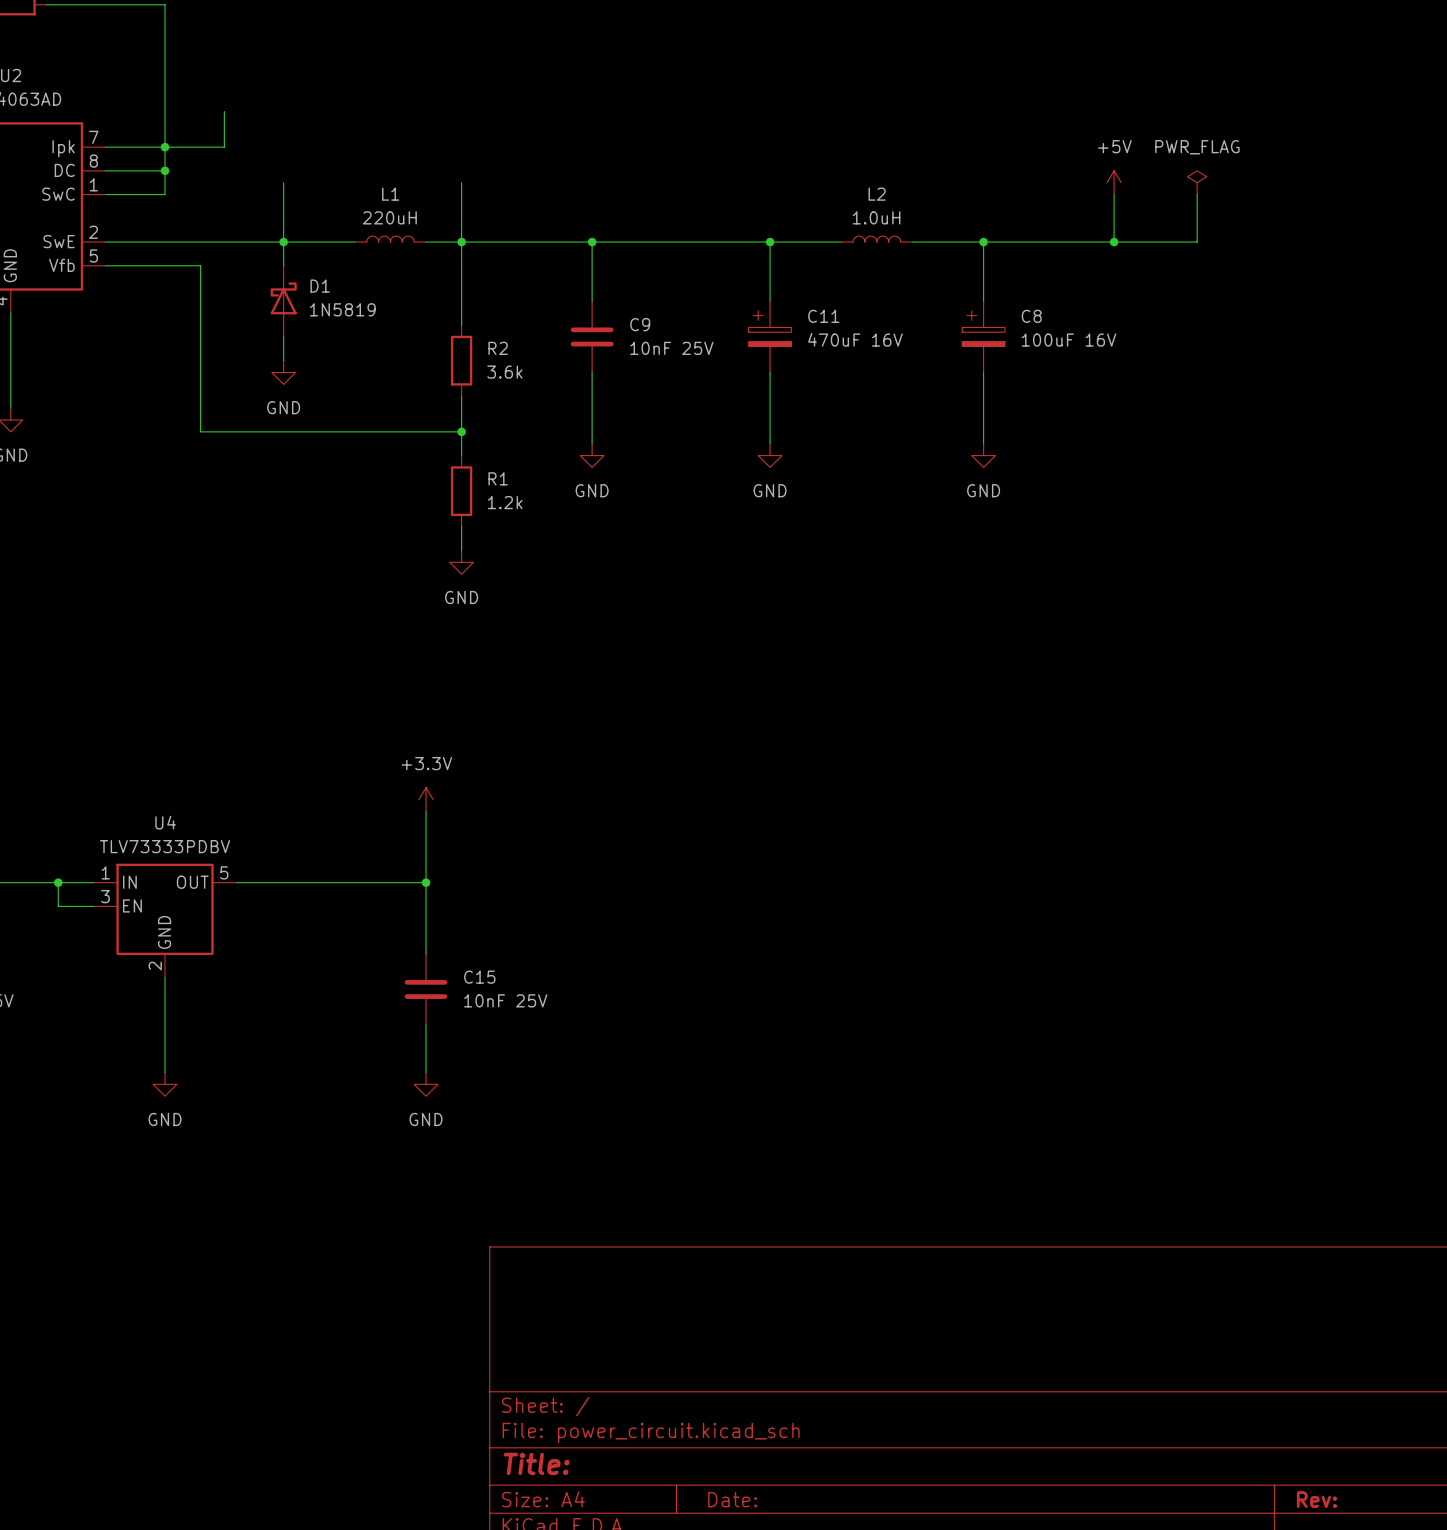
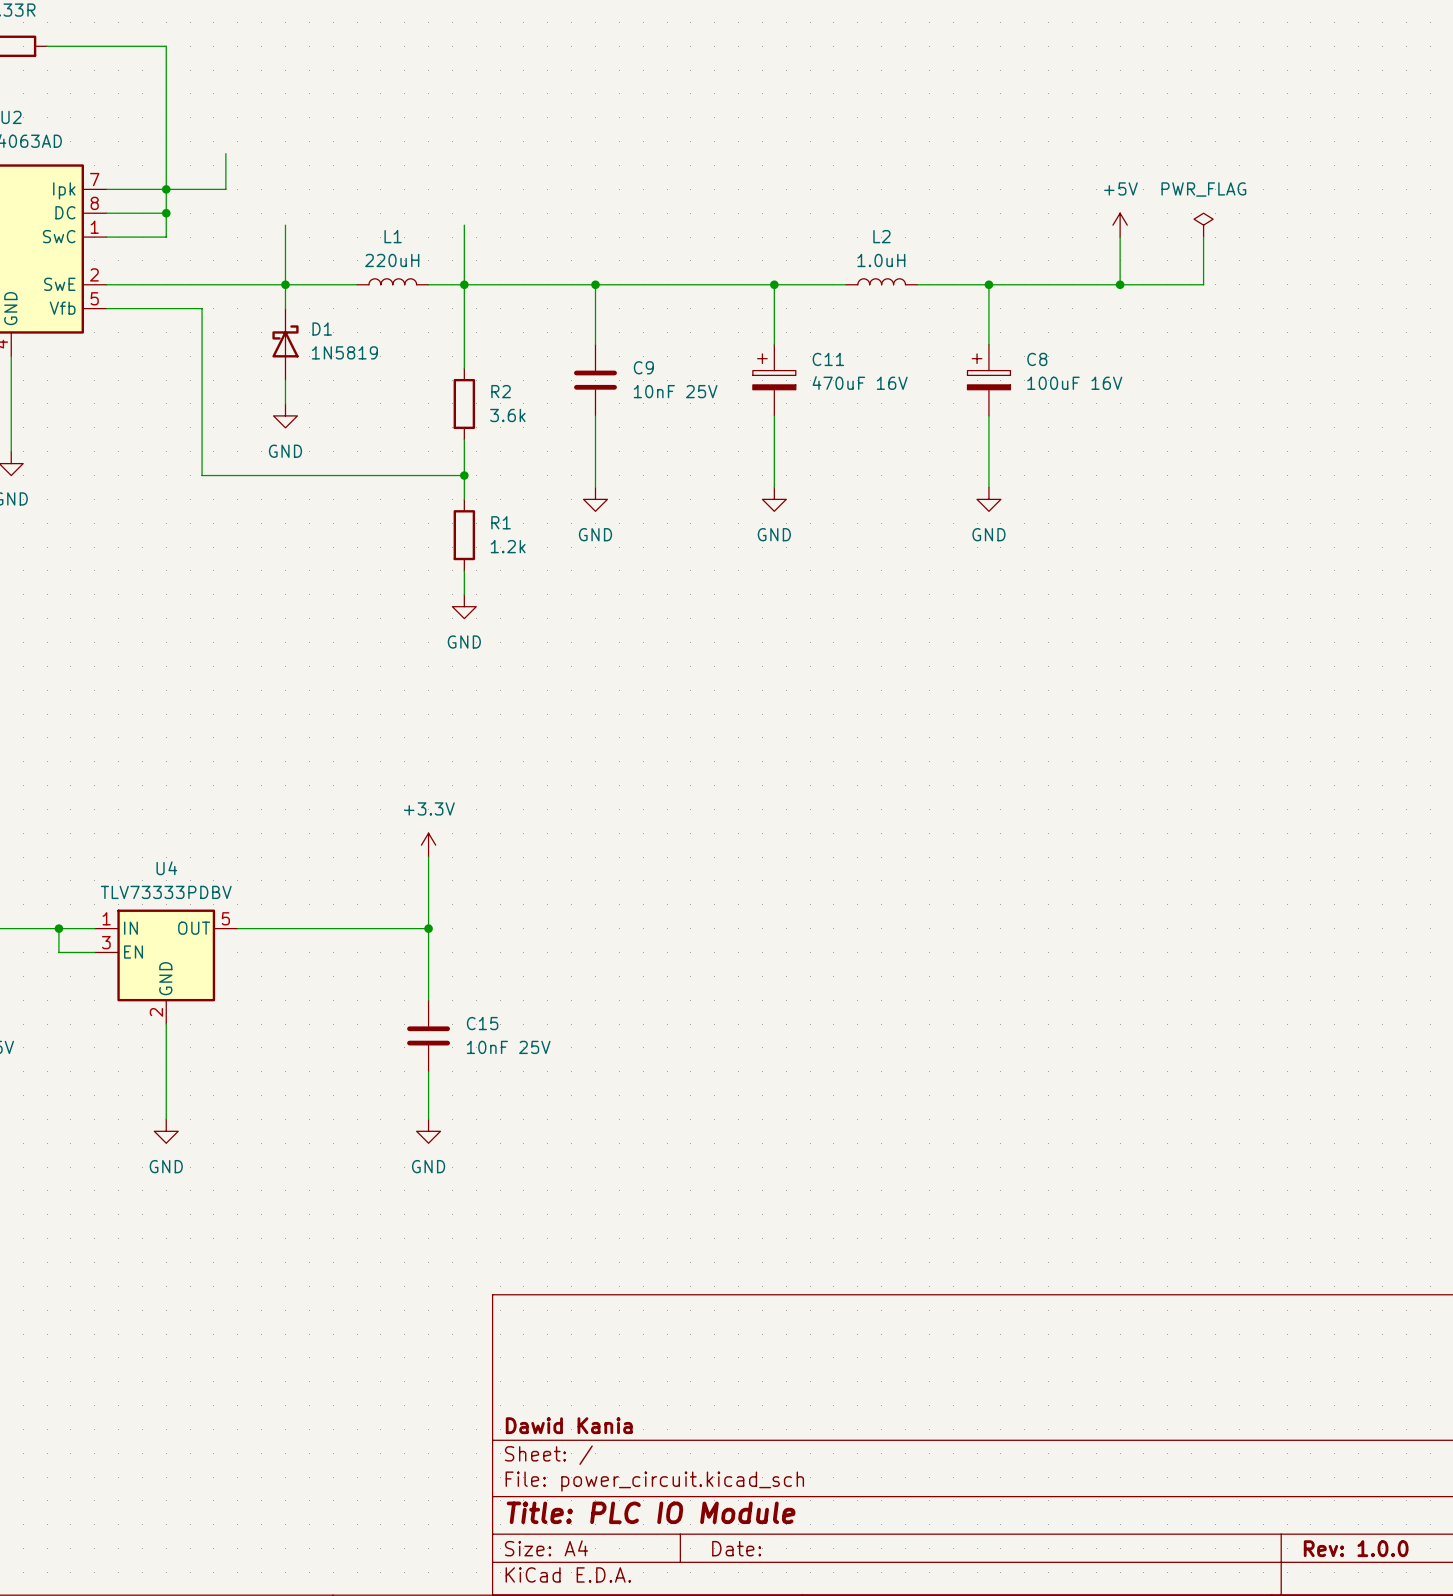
title block: none -> Dawid Kania (569, 1425)
title block: Title: (536, 1463) -> Title: PLC IO Module (651, 1512)
title block: Rev: (1316, 1499) -> Rev: 1.0.0 (1356, 1548)

